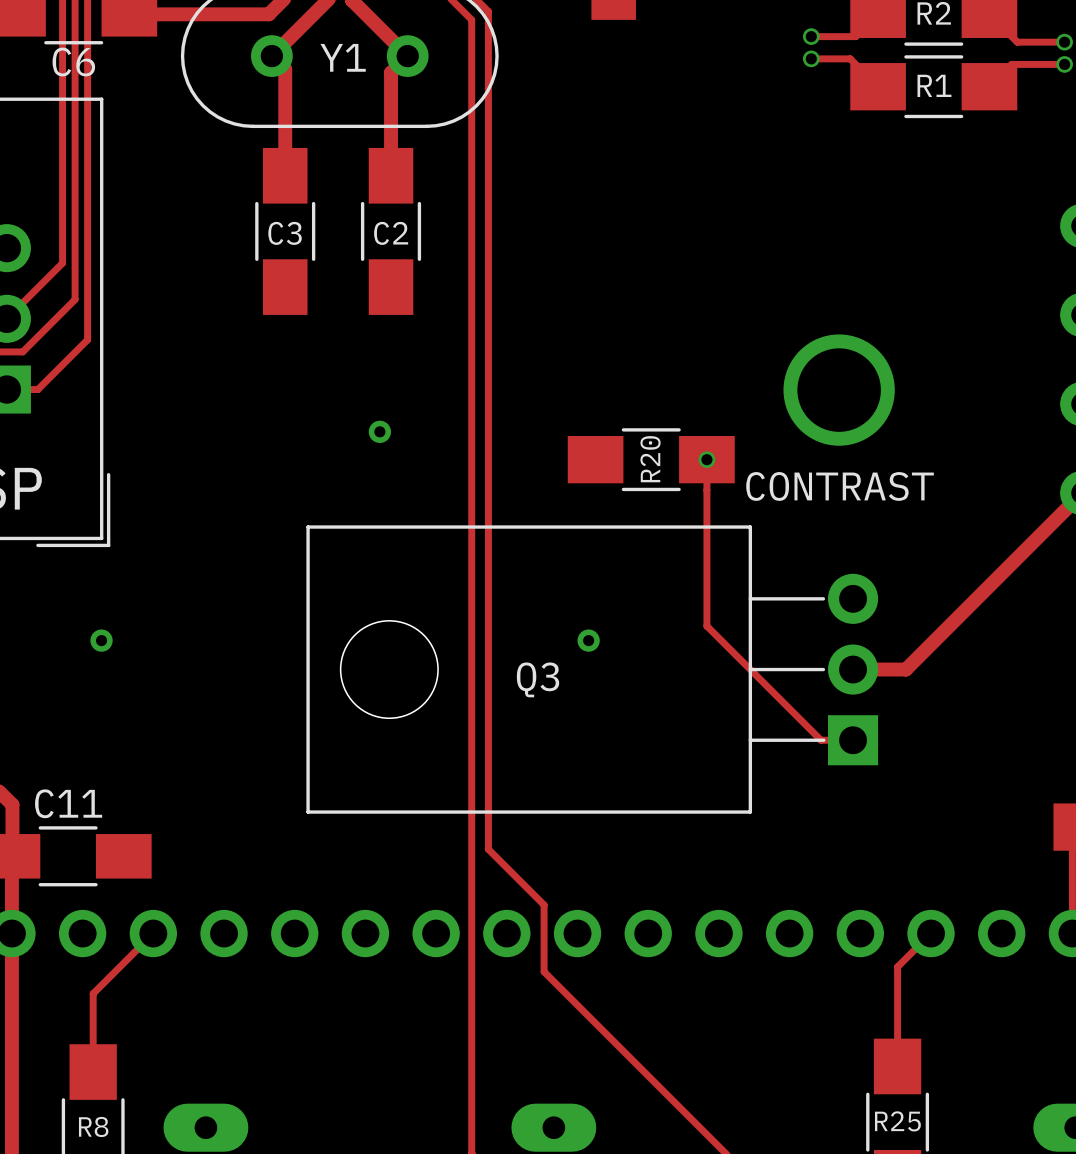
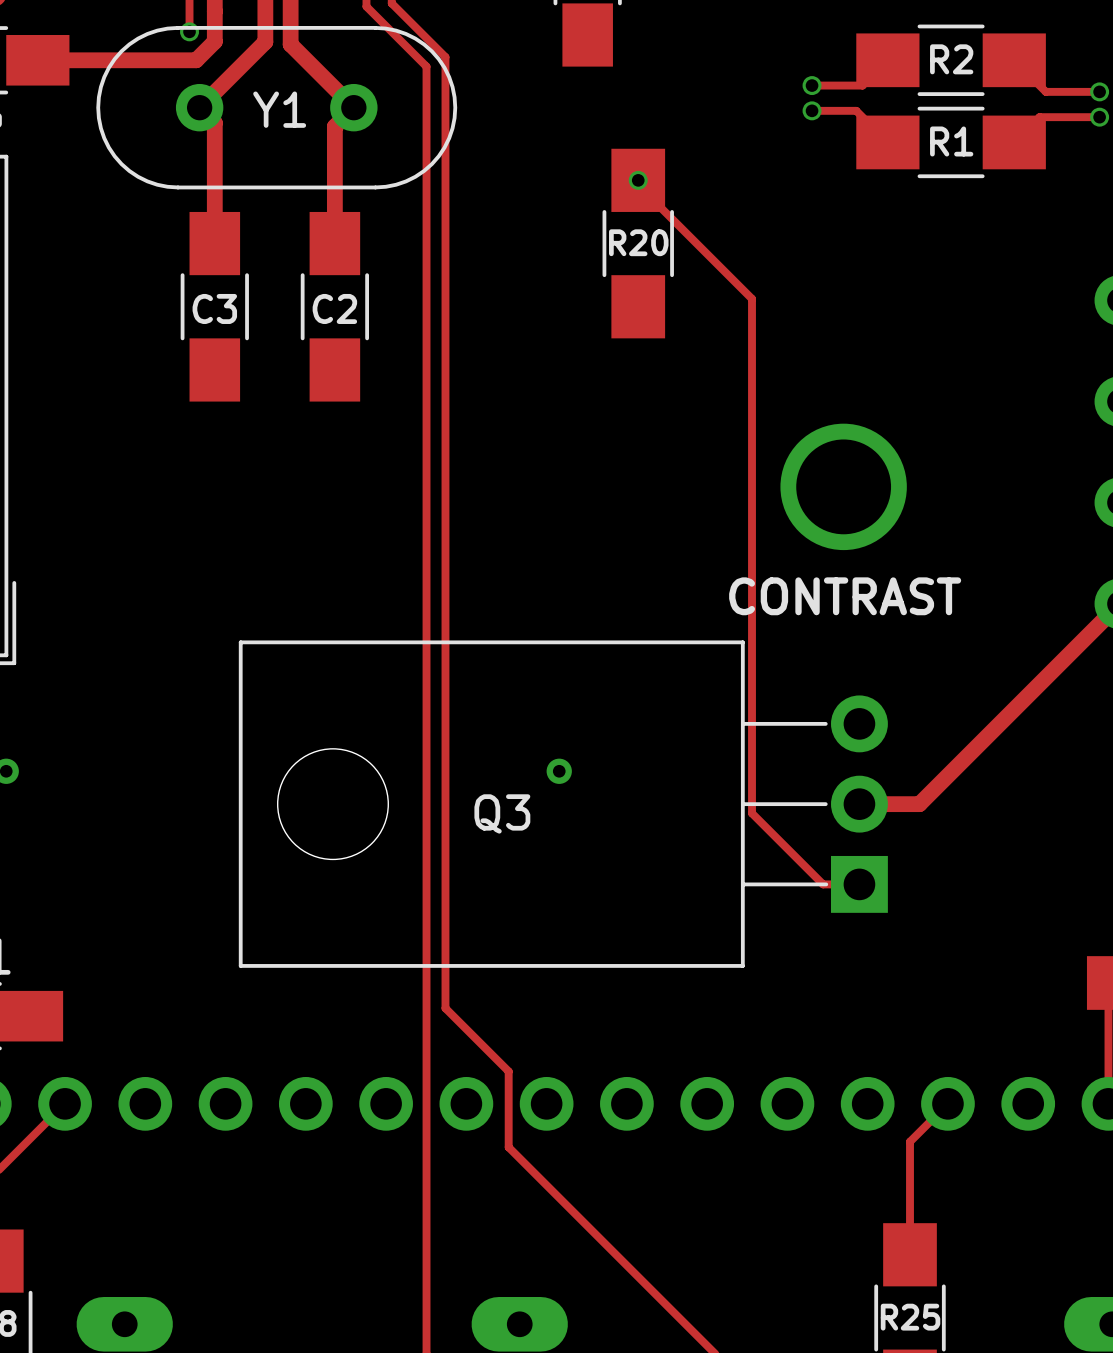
via: none -> (638, 180)
part: (379, 431) -> none
R20 rotation: 0° (651, 459) -> 90° clockwise (638, 243)
R20 position: (651, 459) -> (638, 243)
track: (706, 459) (706, 626) (758, 677) -> (638, 180) (638, 185) (752, 298) (752, 813)
via: (706, 459) -> none

